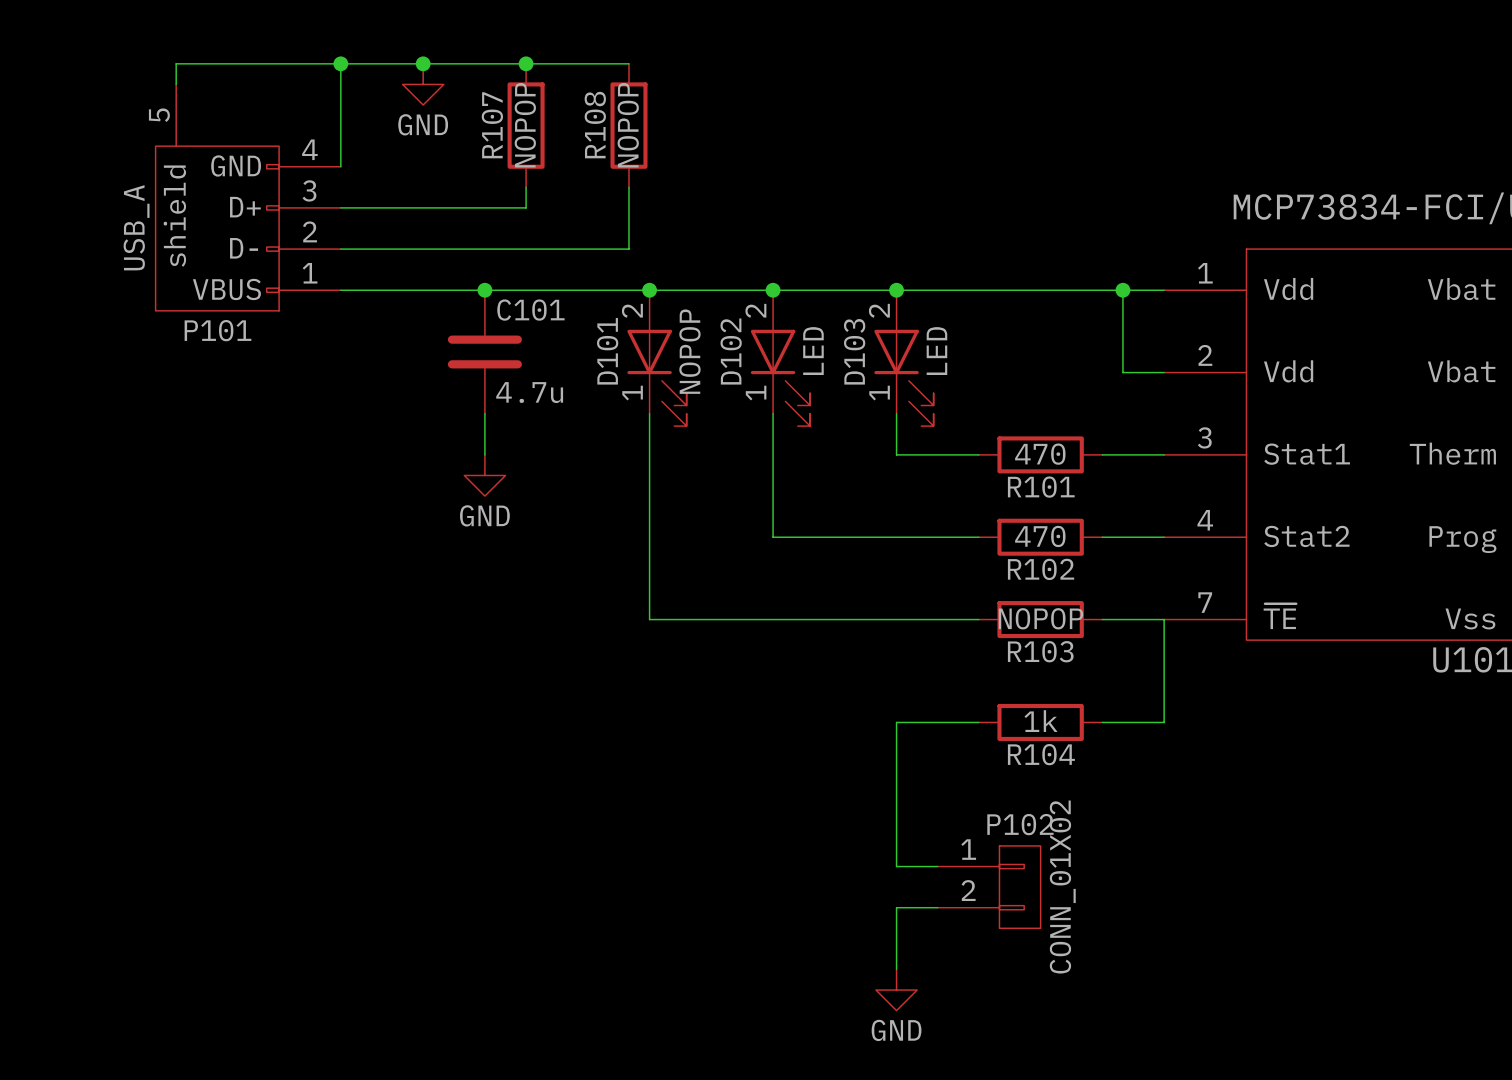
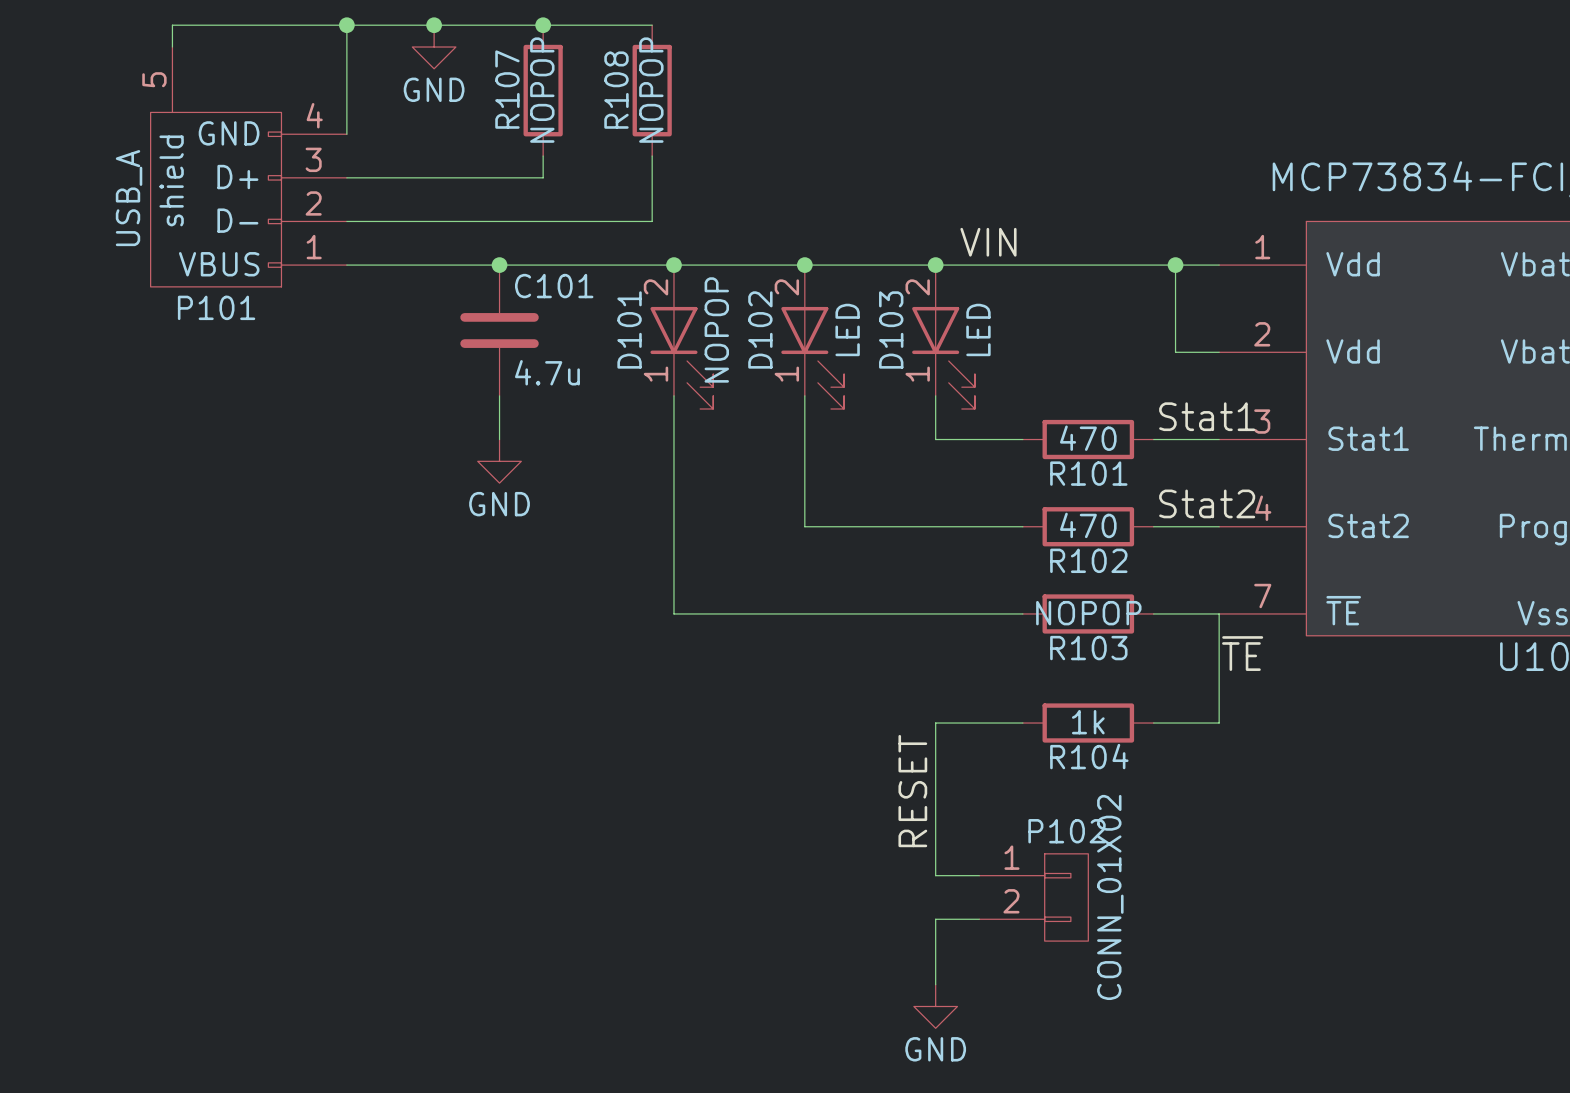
label: none -> VIN (988, 242)
label: none -> Stat1 (1207, 416)
label: none -> Stat2 (1207, 503)
label: none -> ~{TE} (1242, 653)
label: none -> RESET (912, 791)

